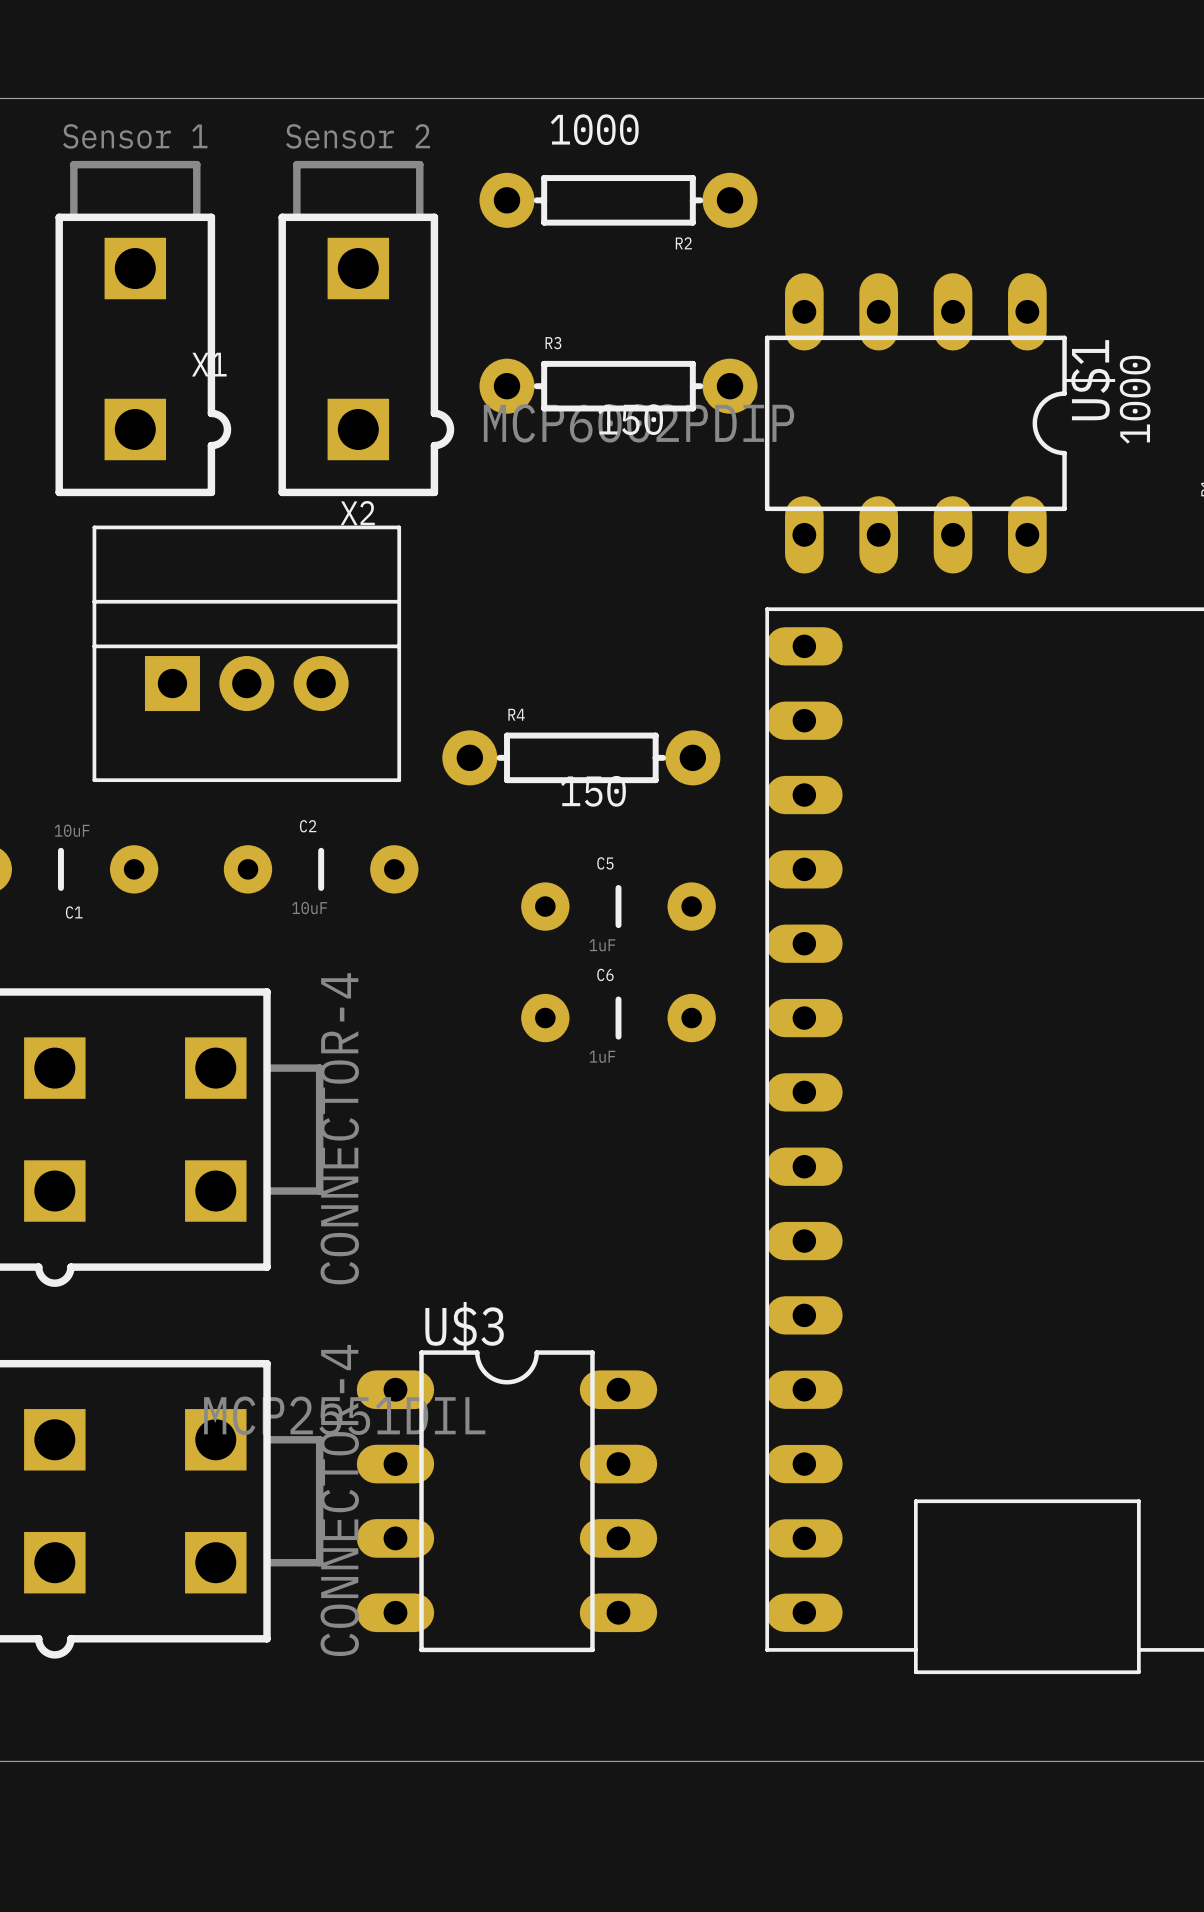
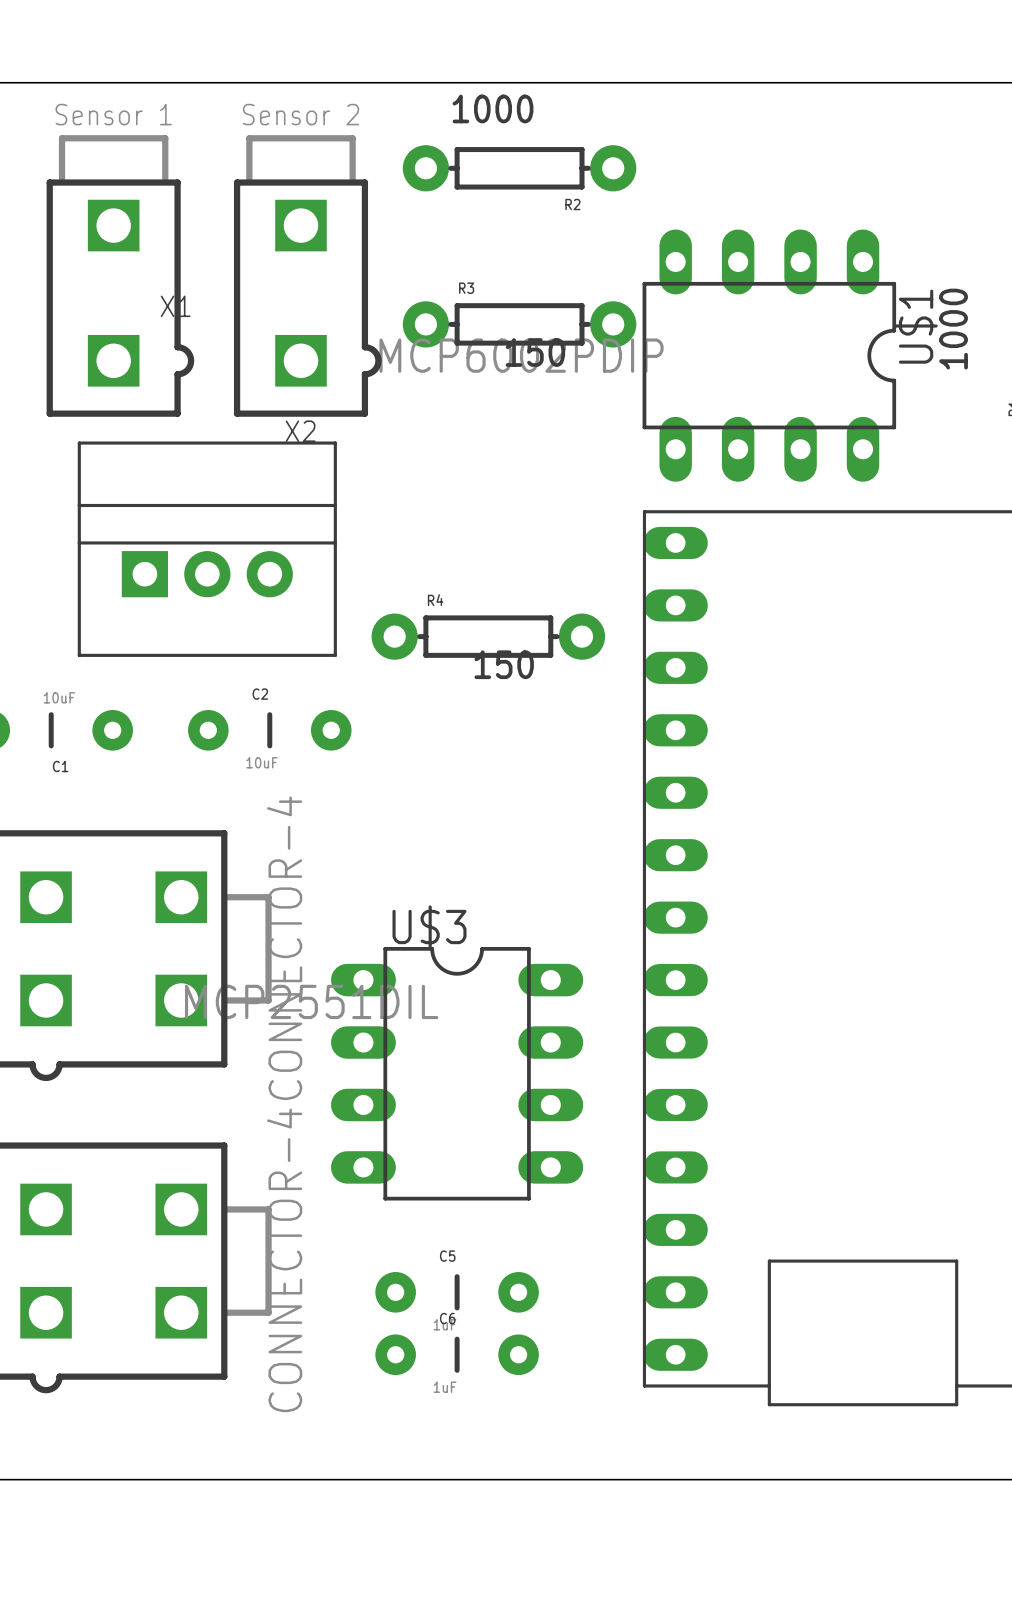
C5 position: (618, 906) -> (457, 1292)
C6 position: (618, 1018) -> (457, 1354)
U$3 position: (506, 1501) -> (457, 1073)

